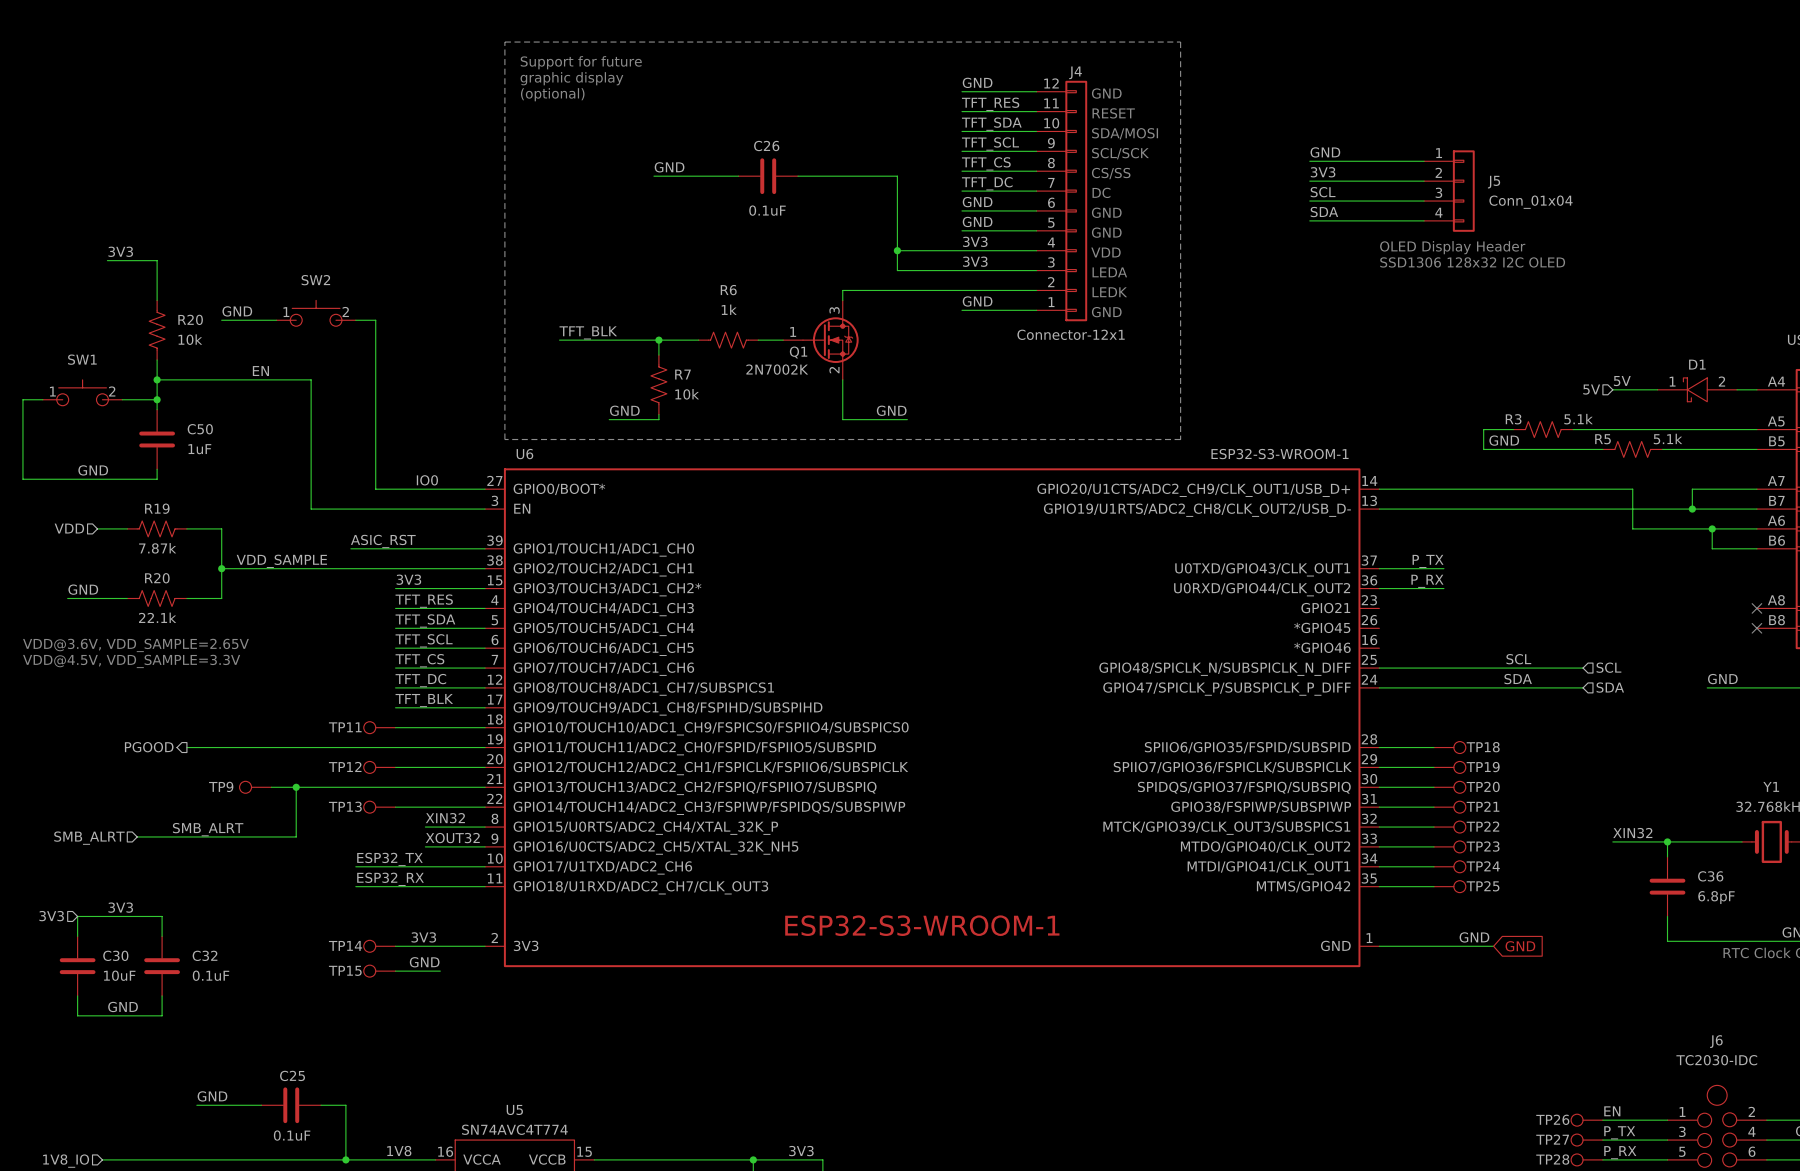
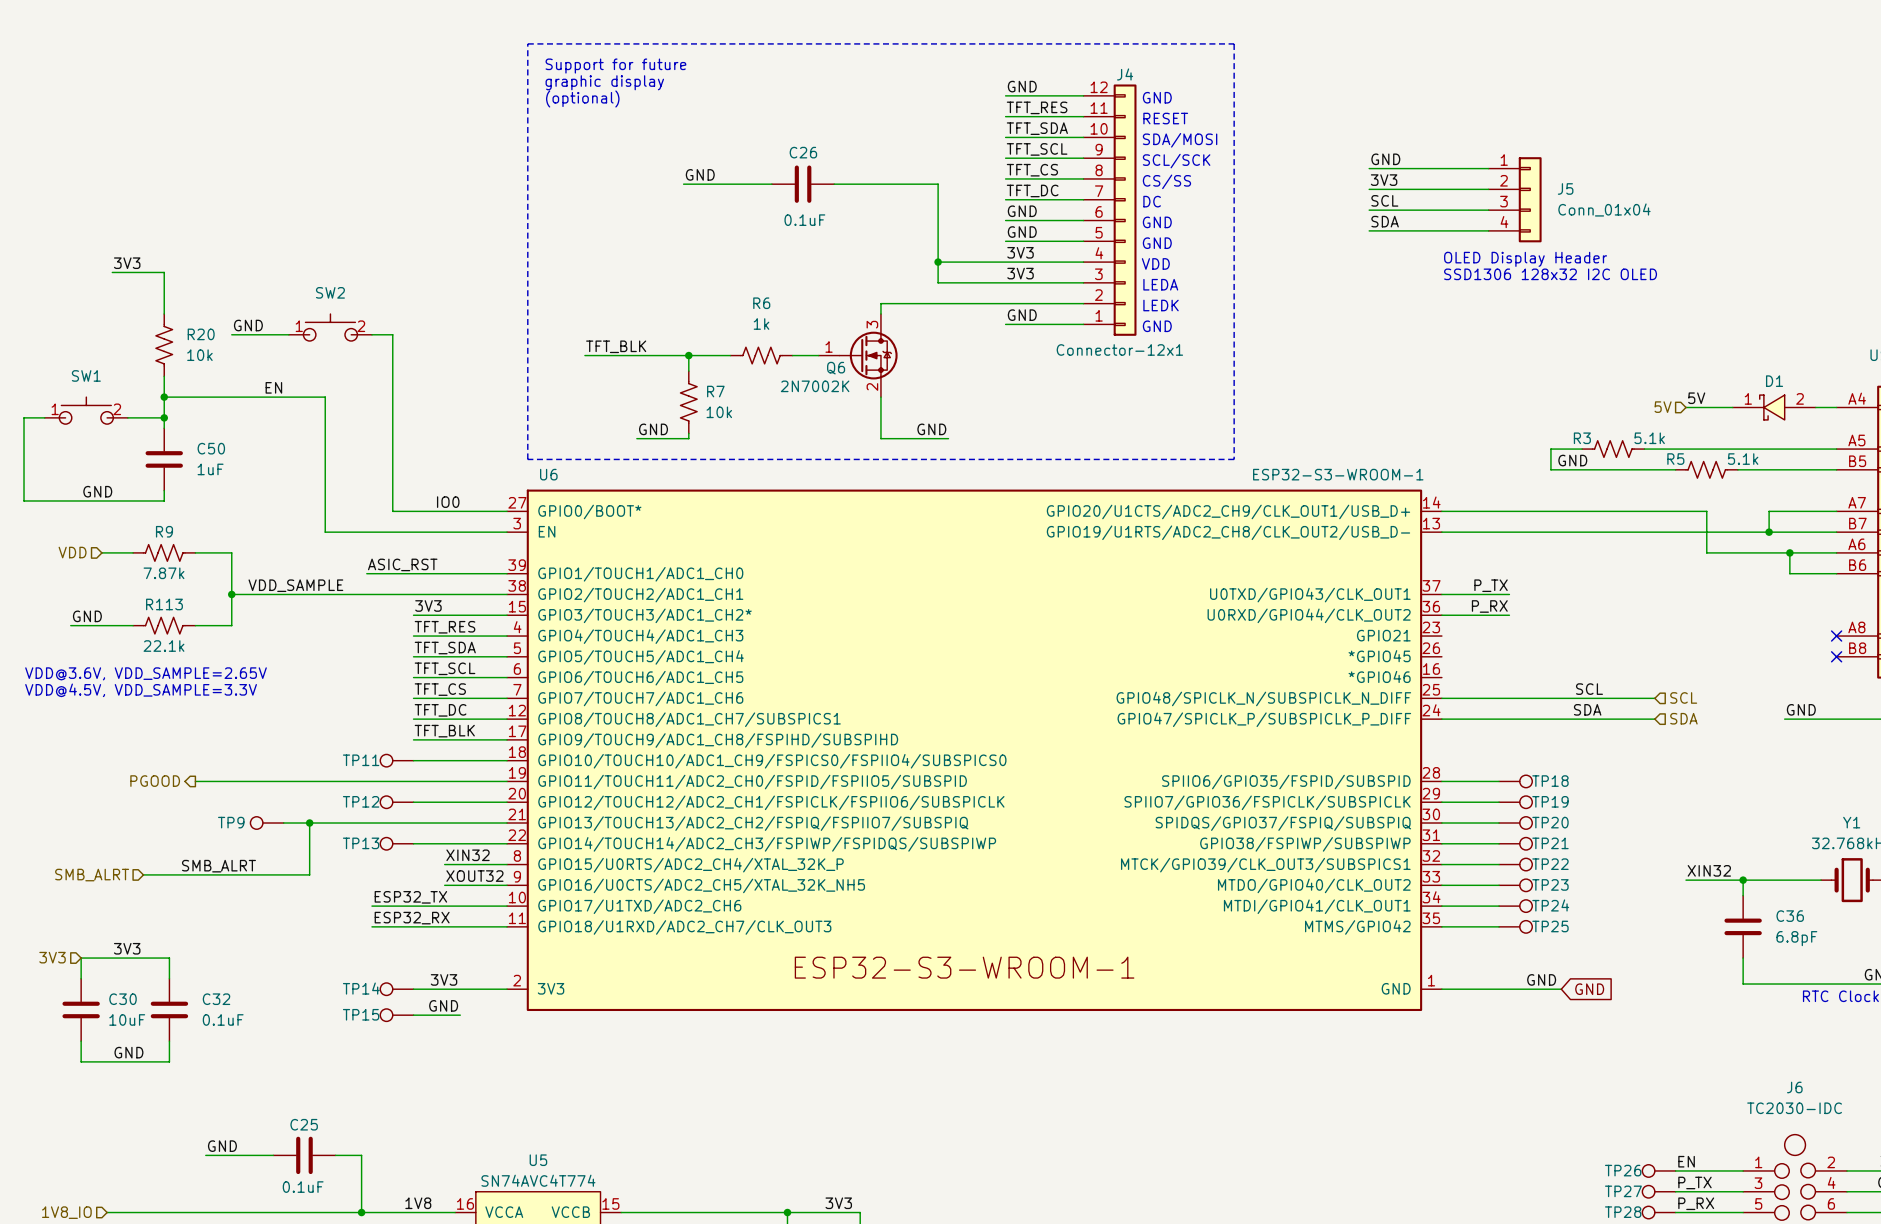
Q1 name: Q1 (798, 352) -> Q6 (836, 368)
R19 name: R19 (157, 508) -> R9 (164, 531)
R20 name: R20 (157, 578) -> R113 (164, 604)

